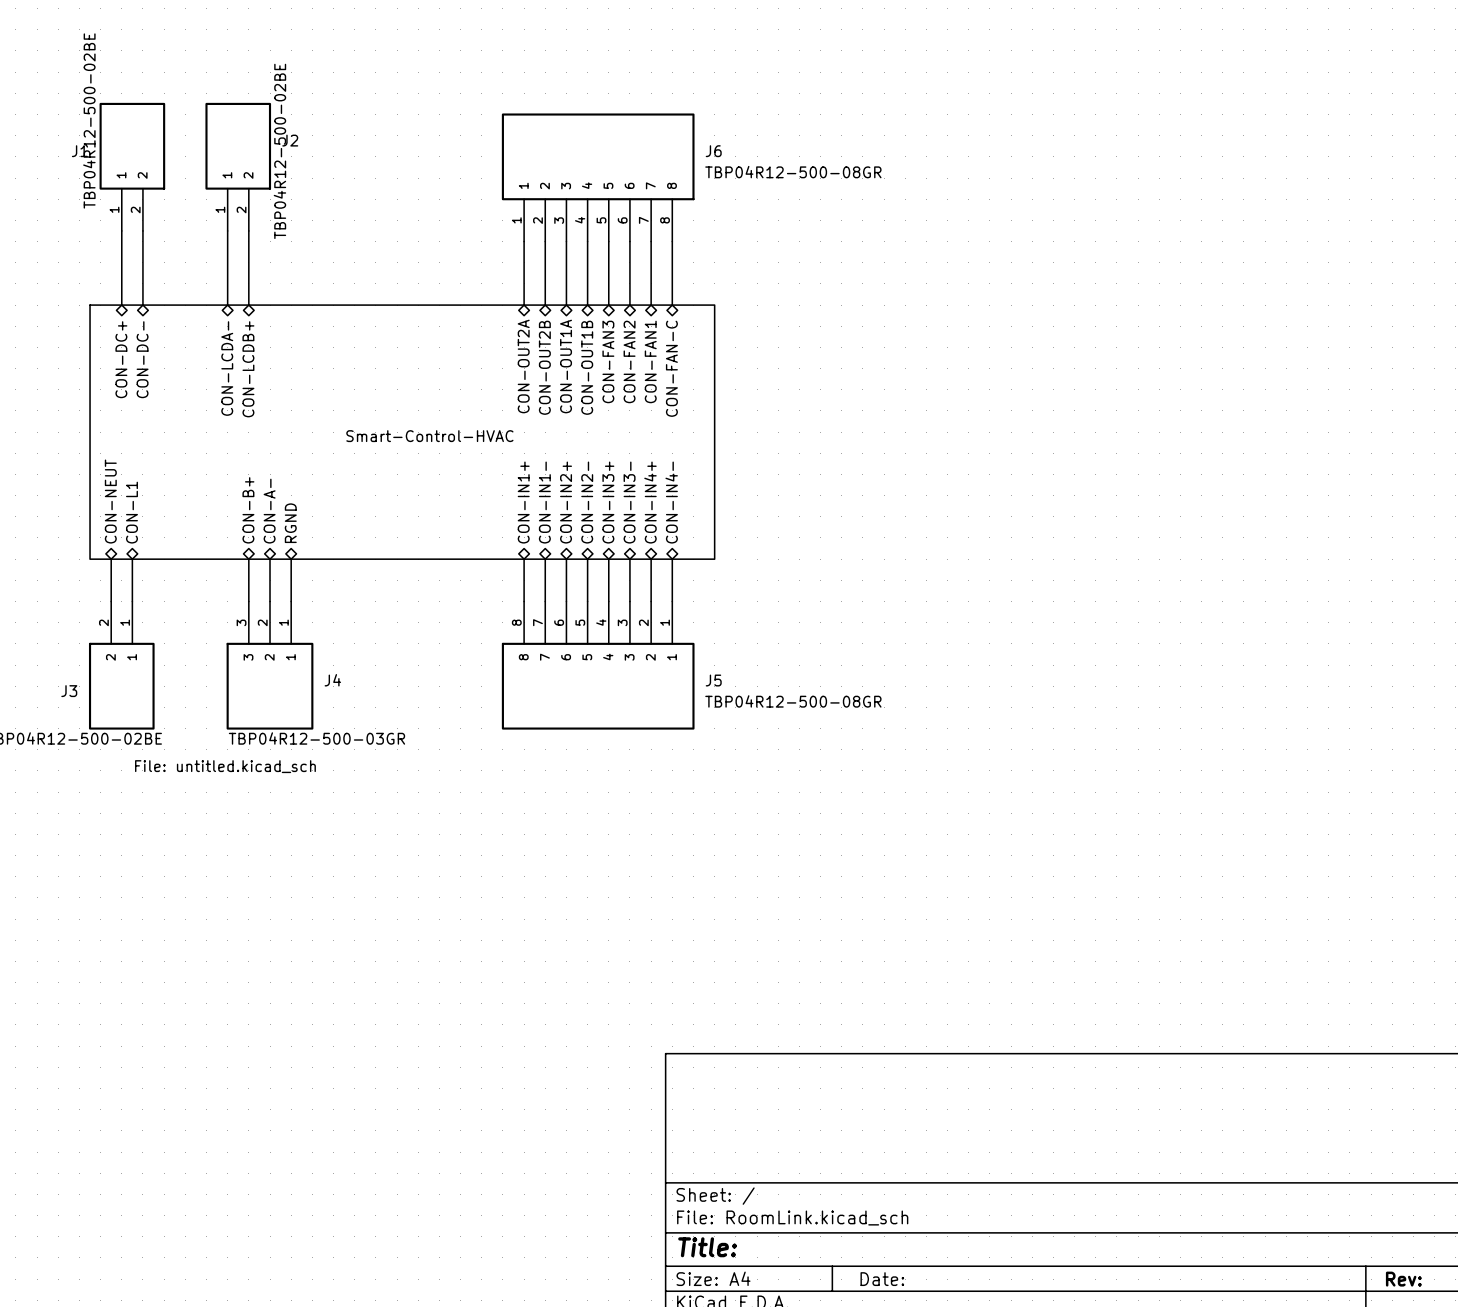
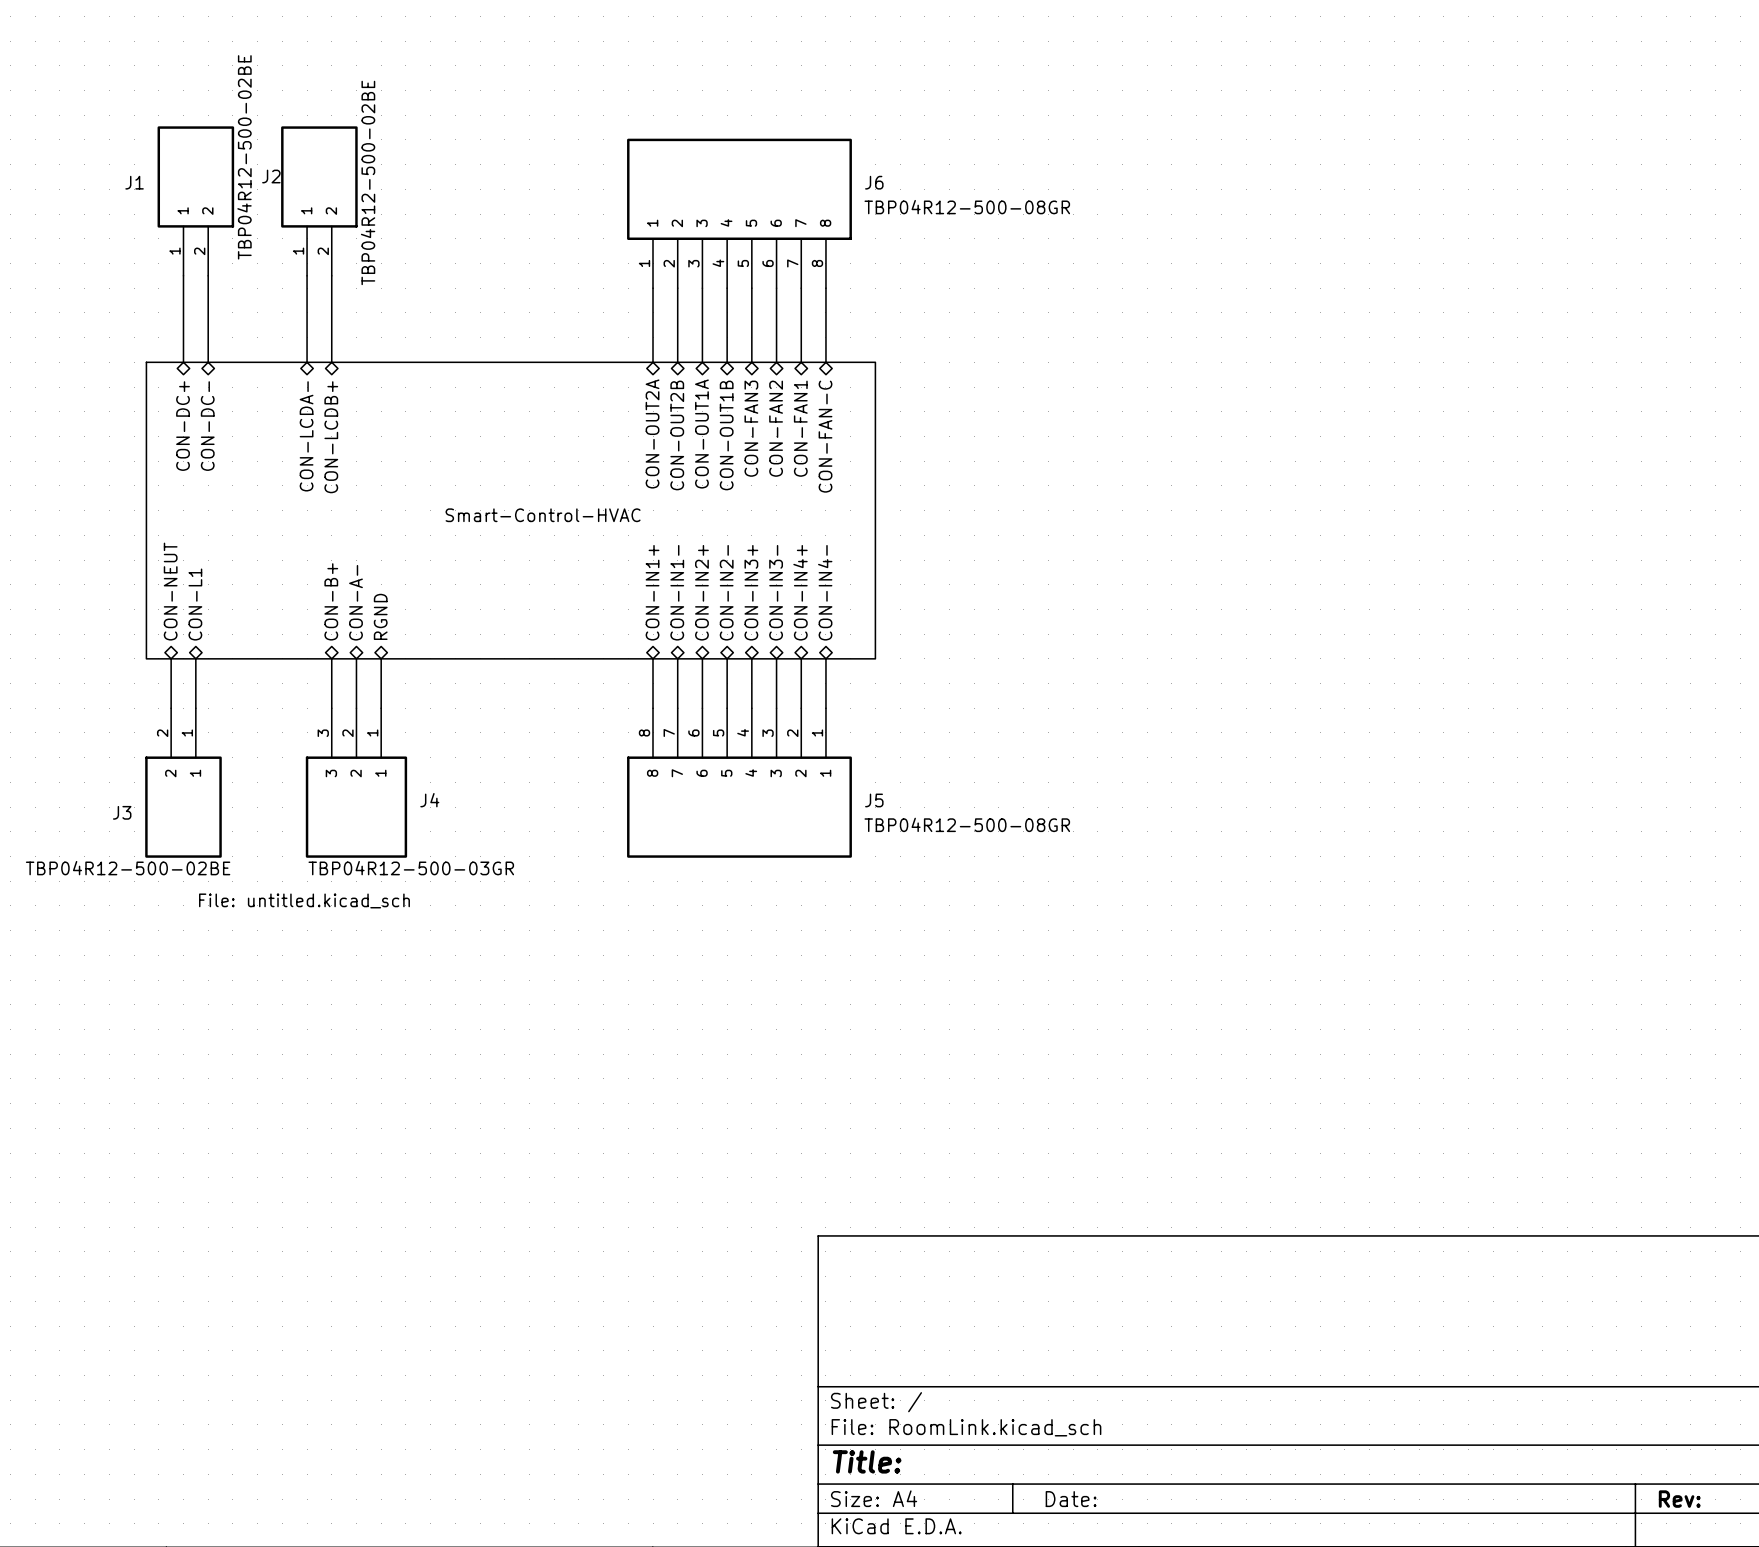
J1 value position: TBP04R12-500-02BE (89, 120) -> TBP04R12-500-02BE (244, 157)
J2 name position: J2 (290, 140) -> J2 (271, 176)

